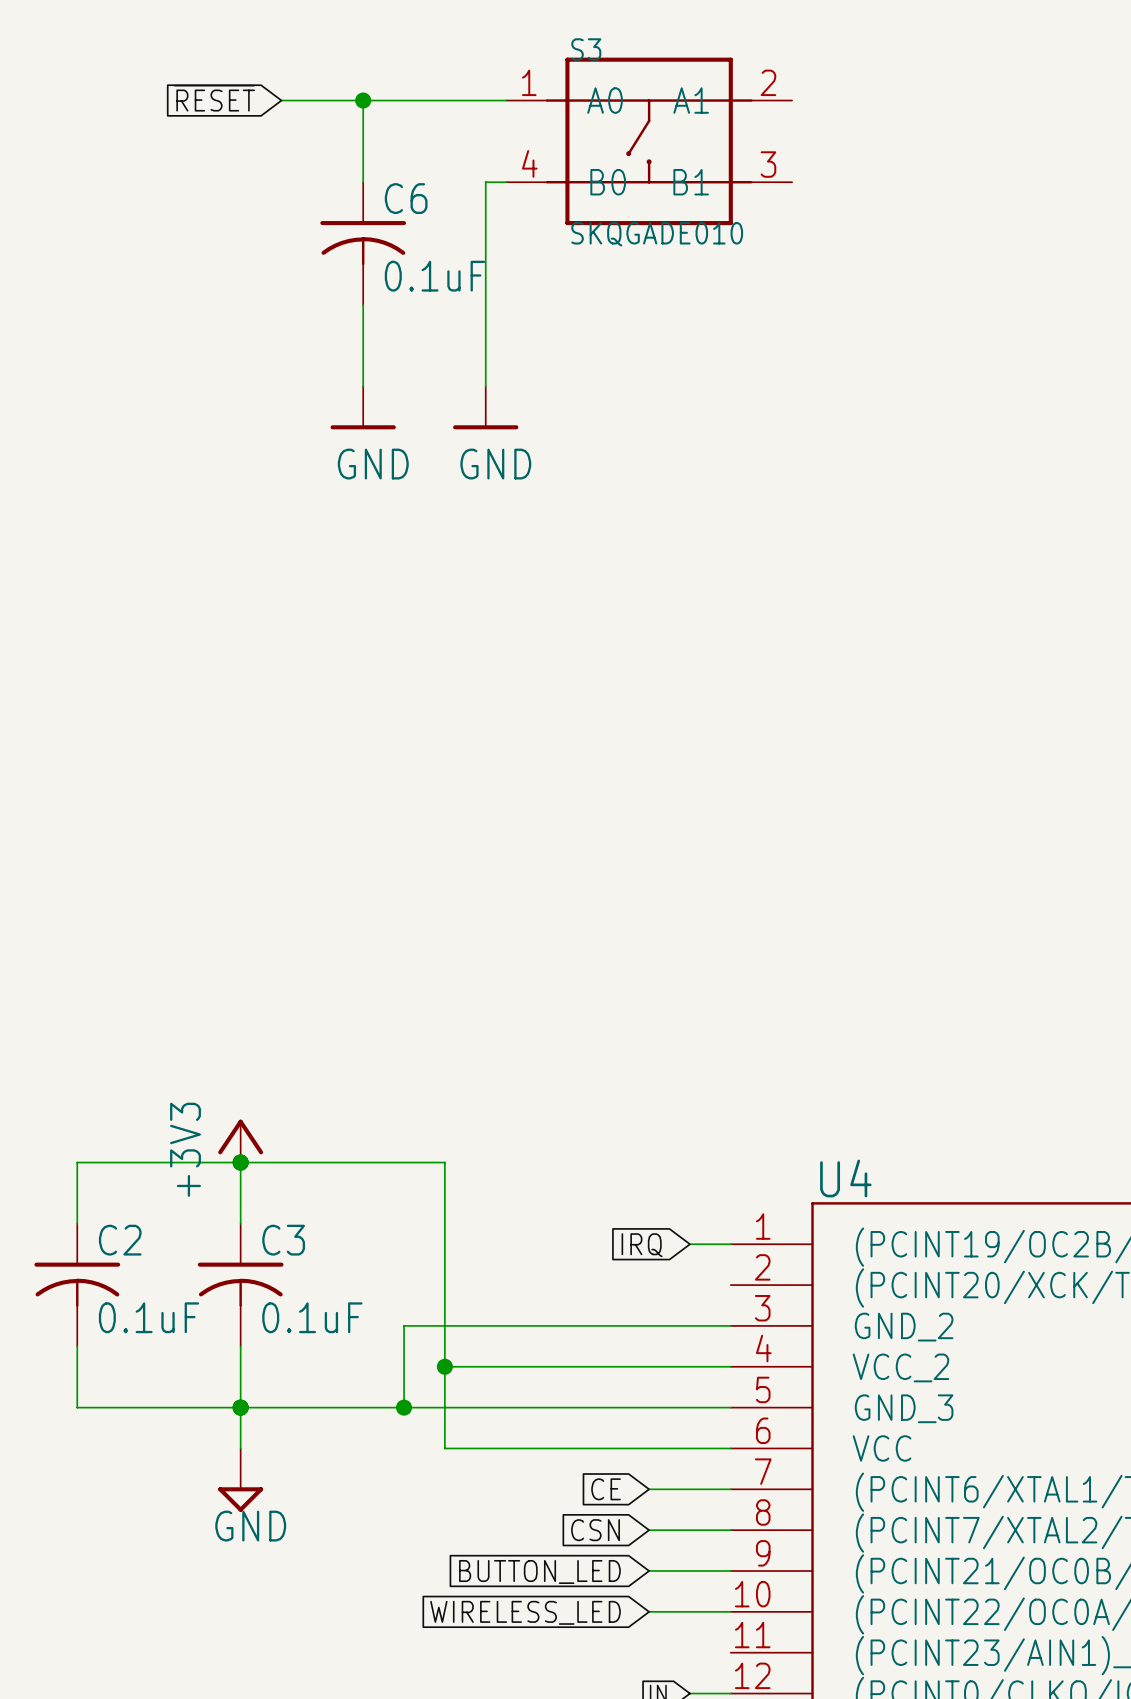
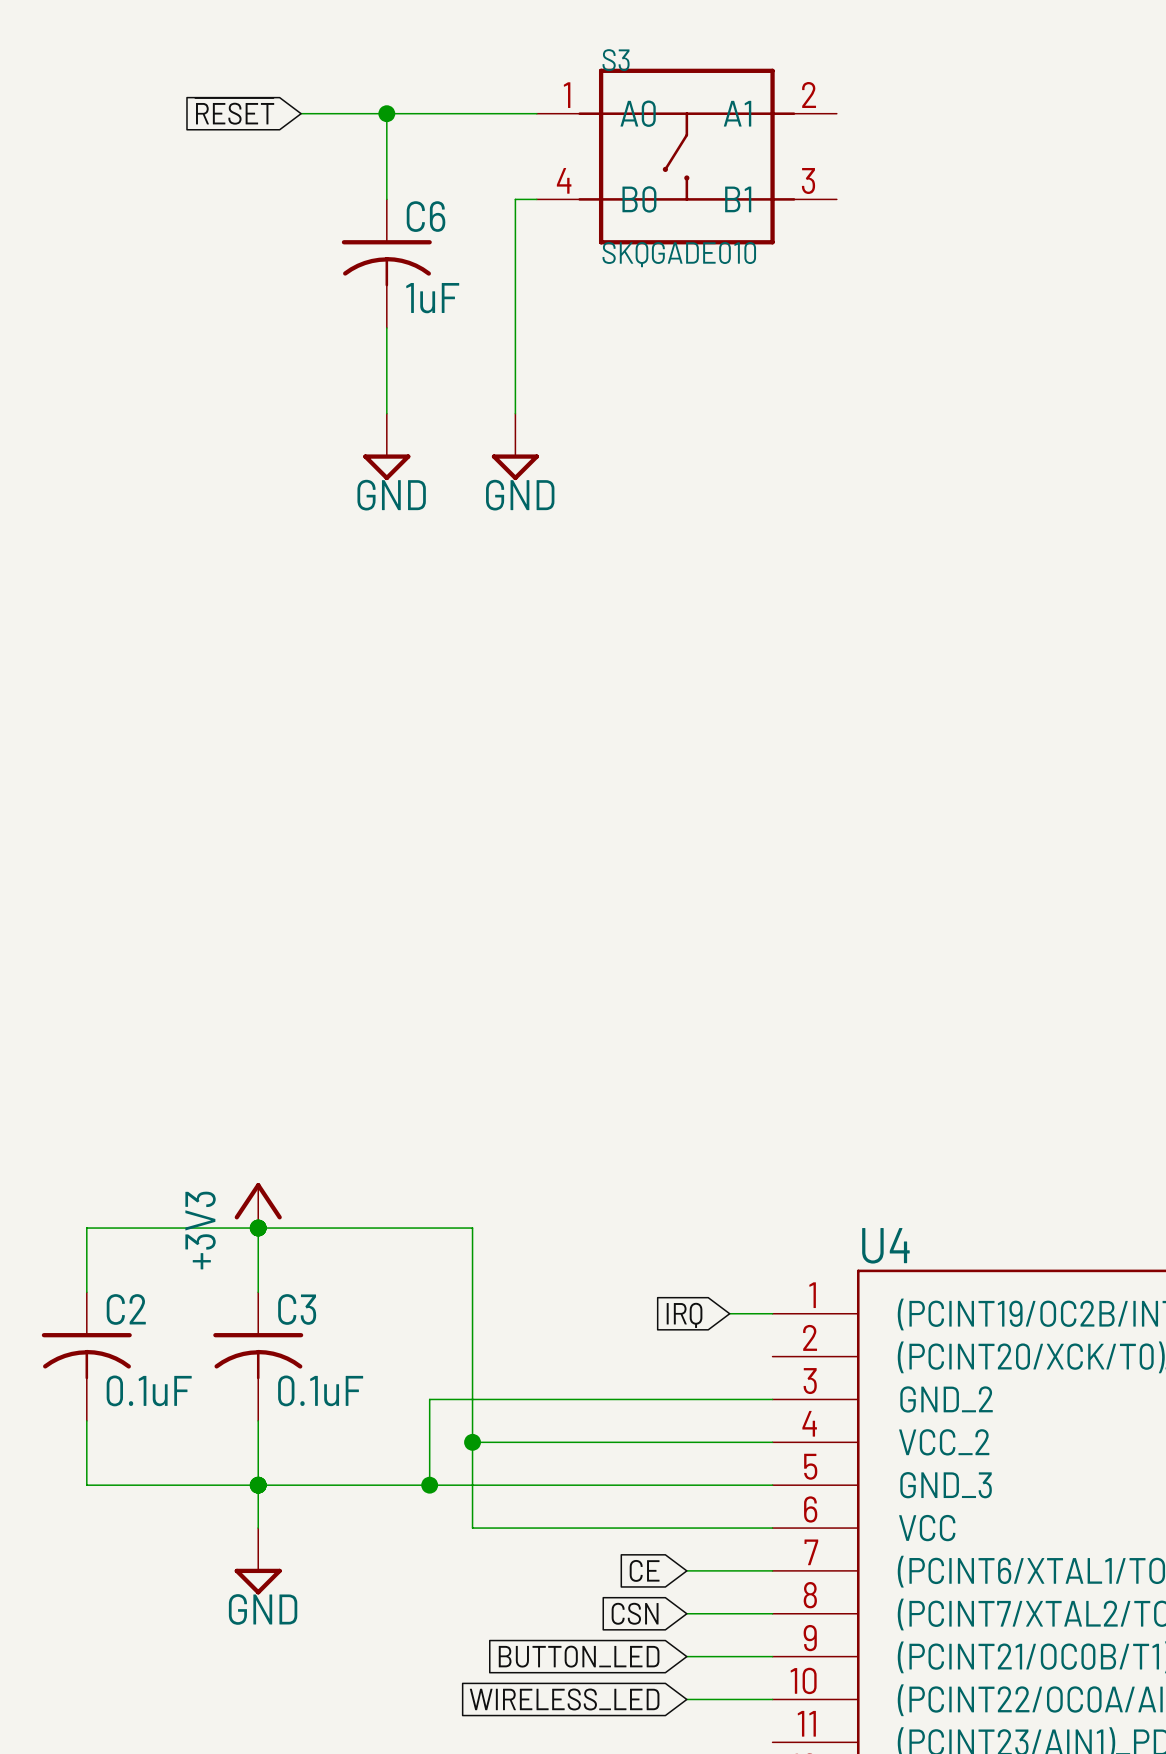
C6 value: 0.1uF (434, 276) -> 1uF (432, 298)
power symbol shape: [330, 386, 396, 430] -> [363, 413, 411, 481]
power symbol shape: [453, 386, 519, 430] -> [491, 413, 539, 481]

